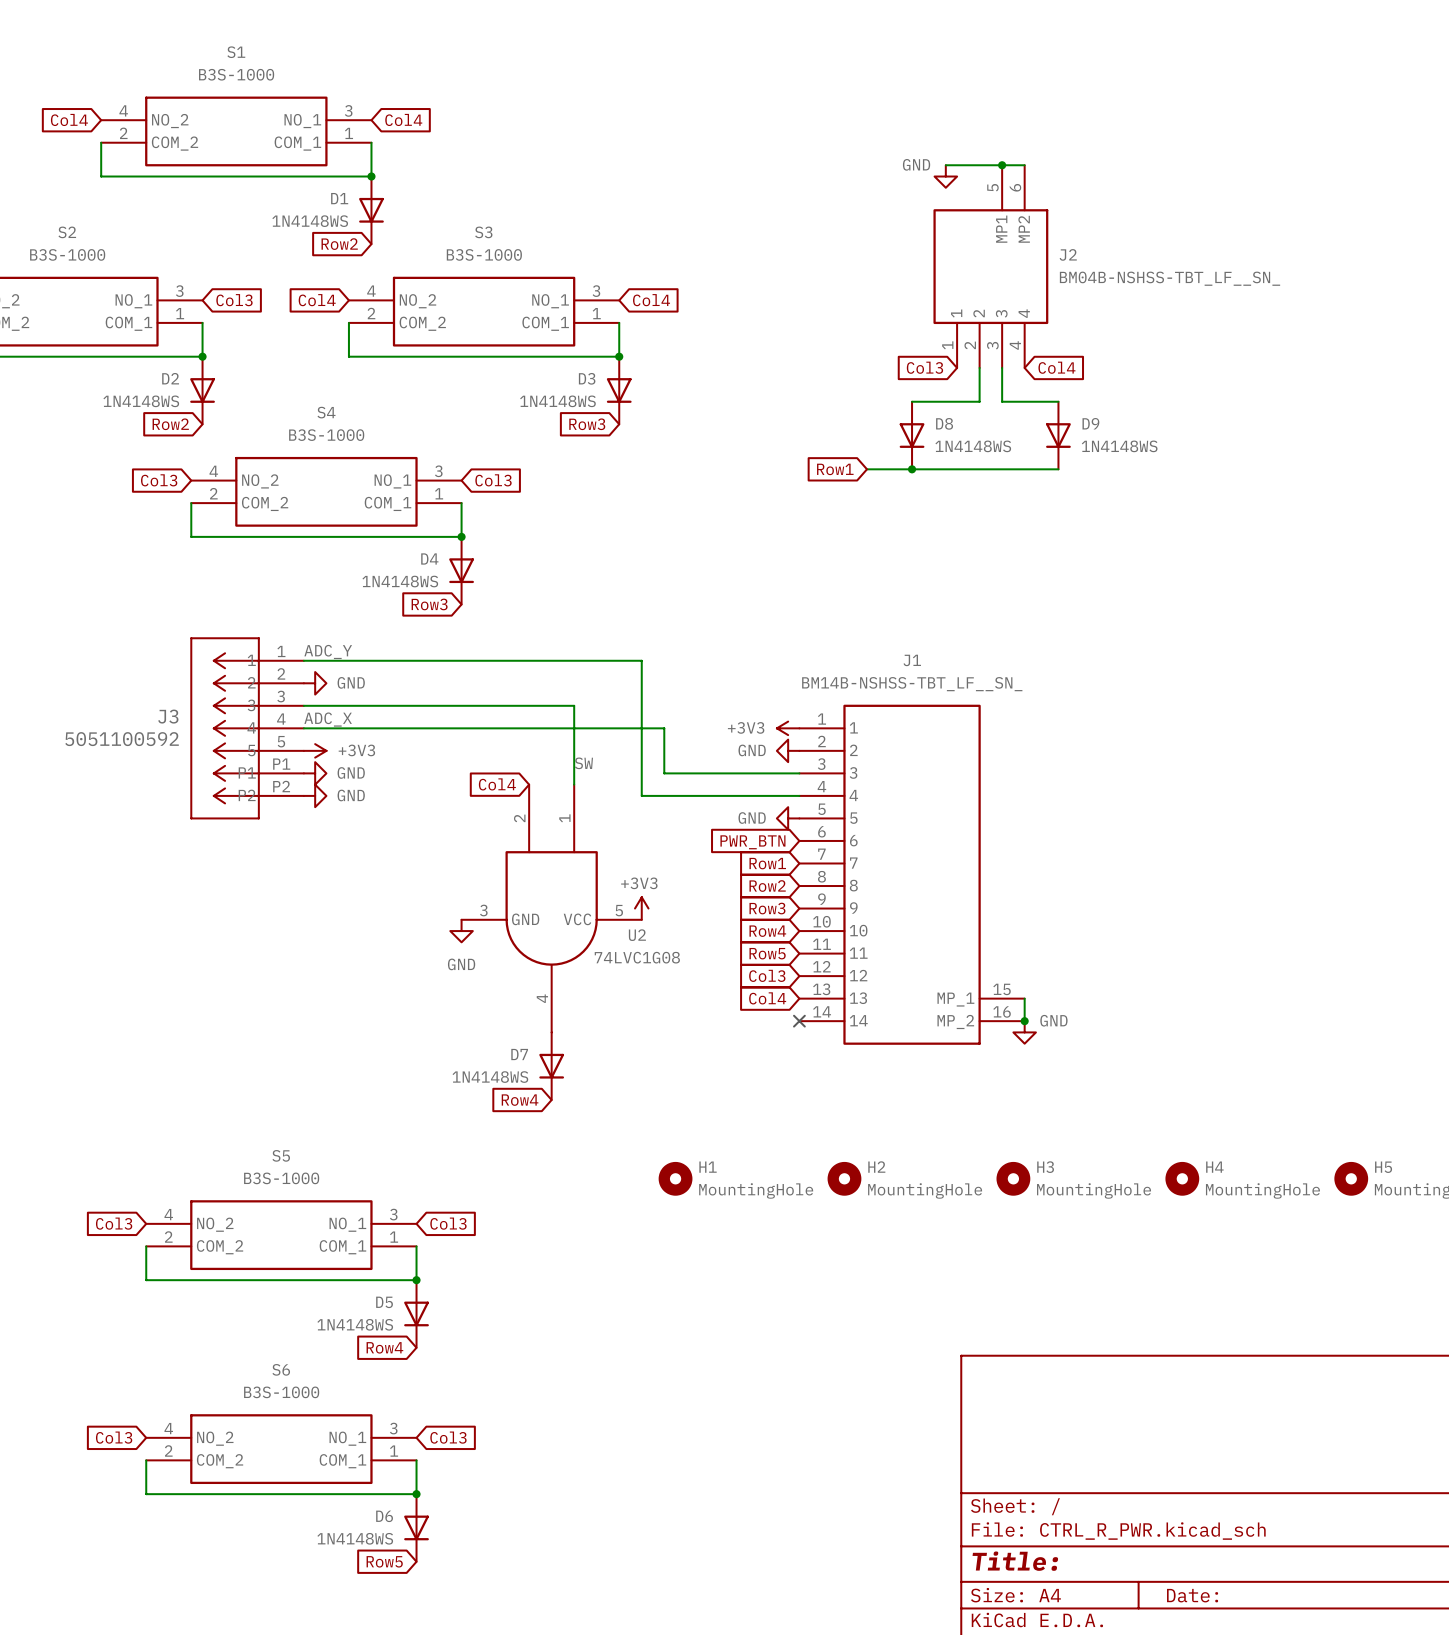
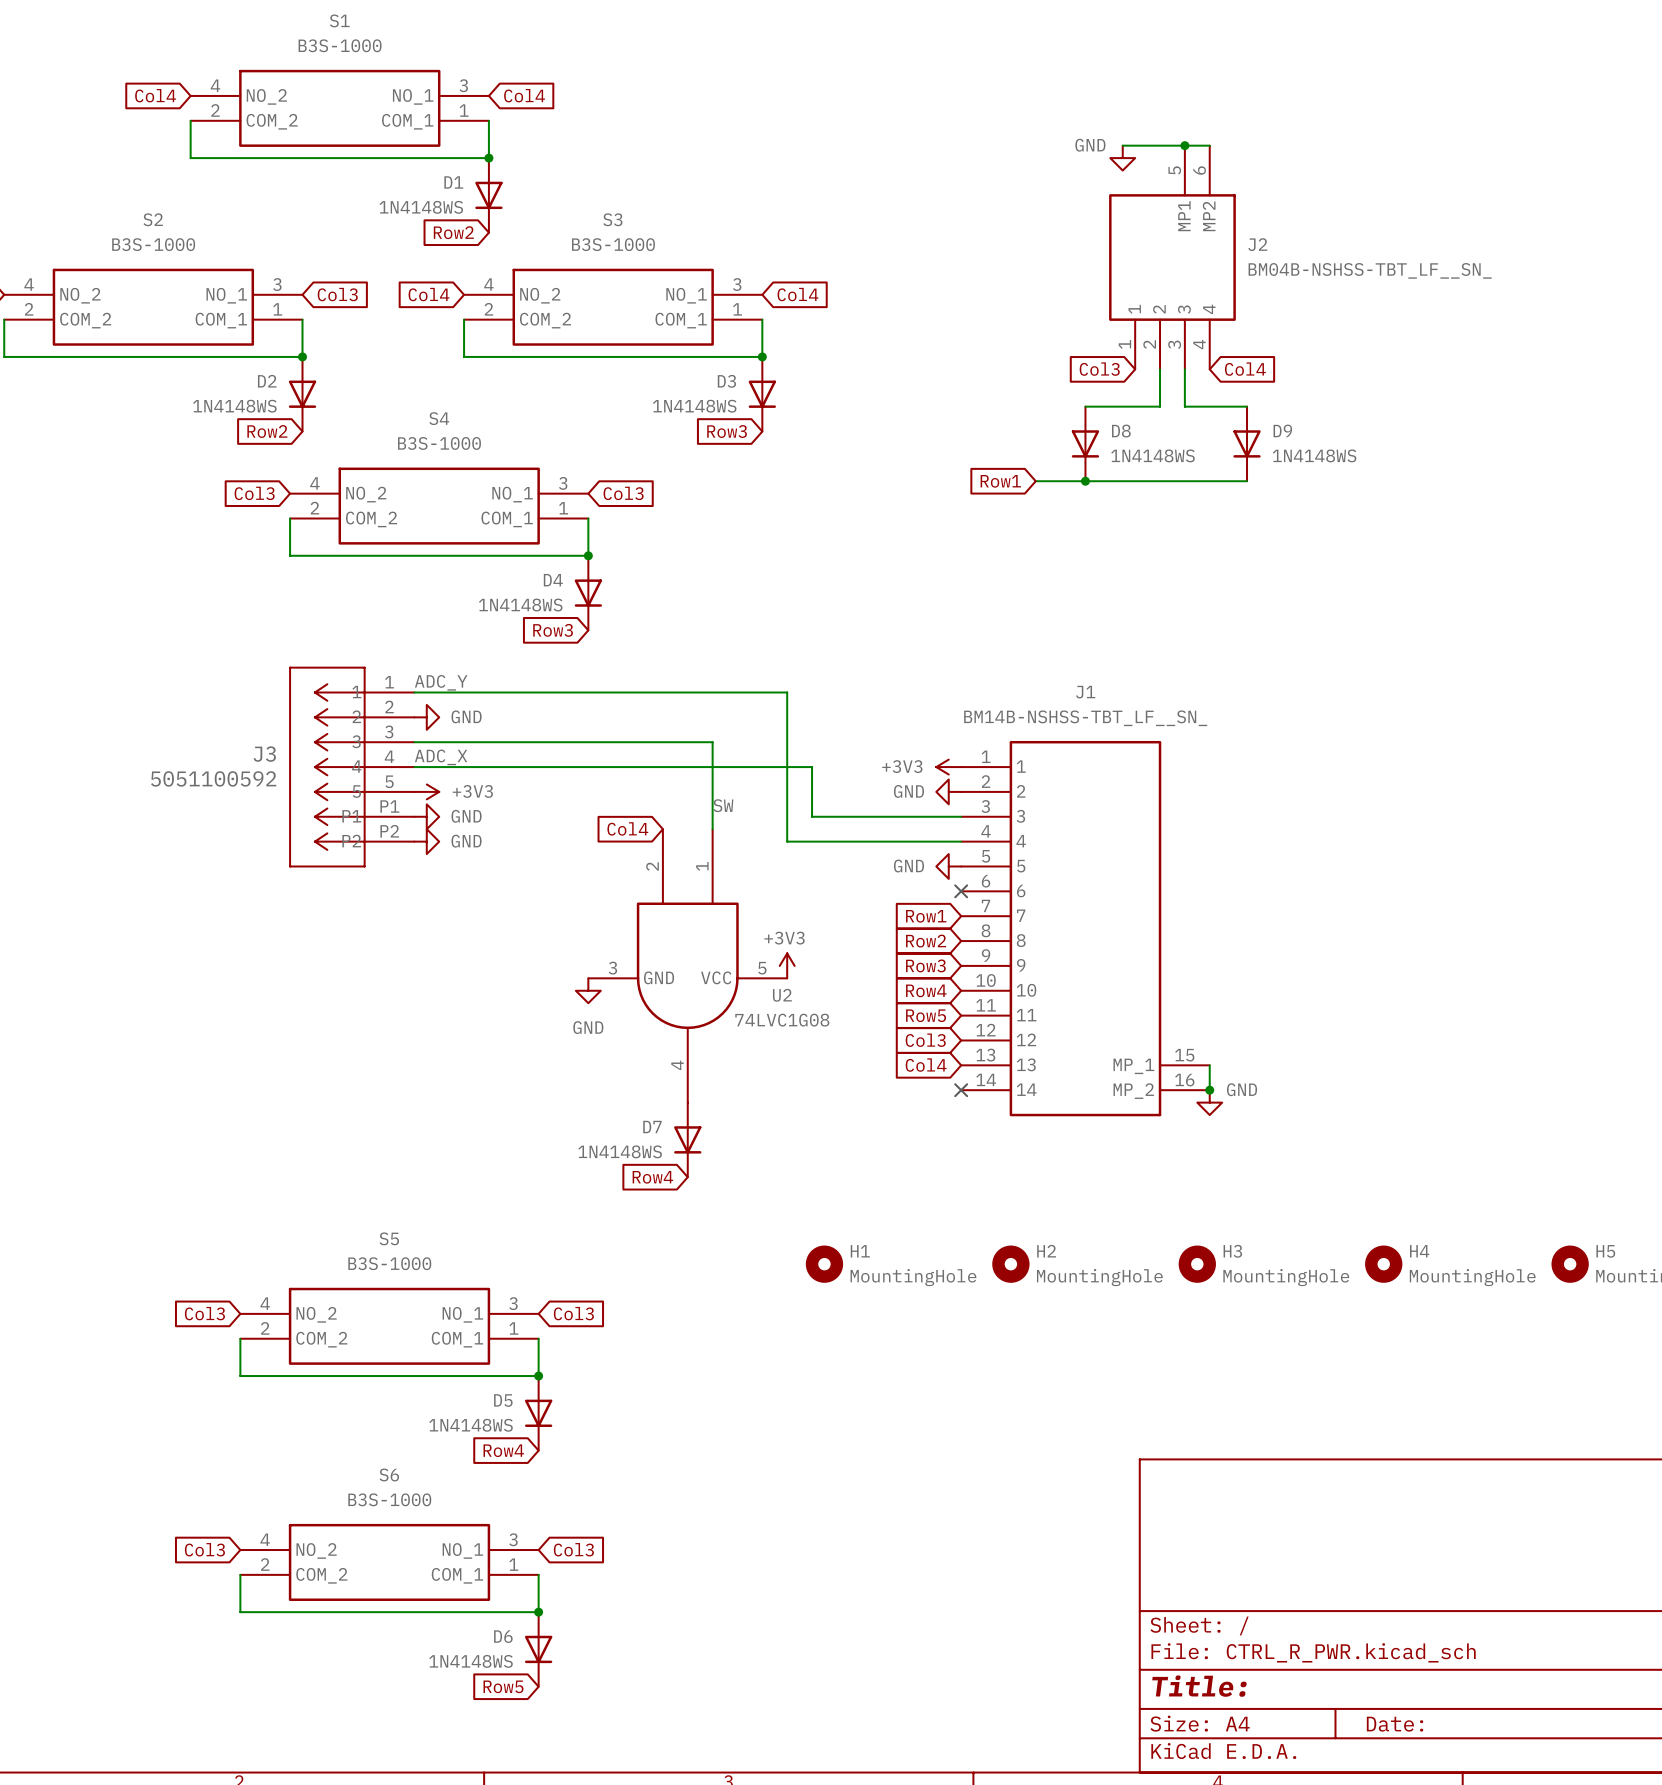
no-connect mark: none -> (961, 891)
global label: PWR_BTN (752, 842) -> none

